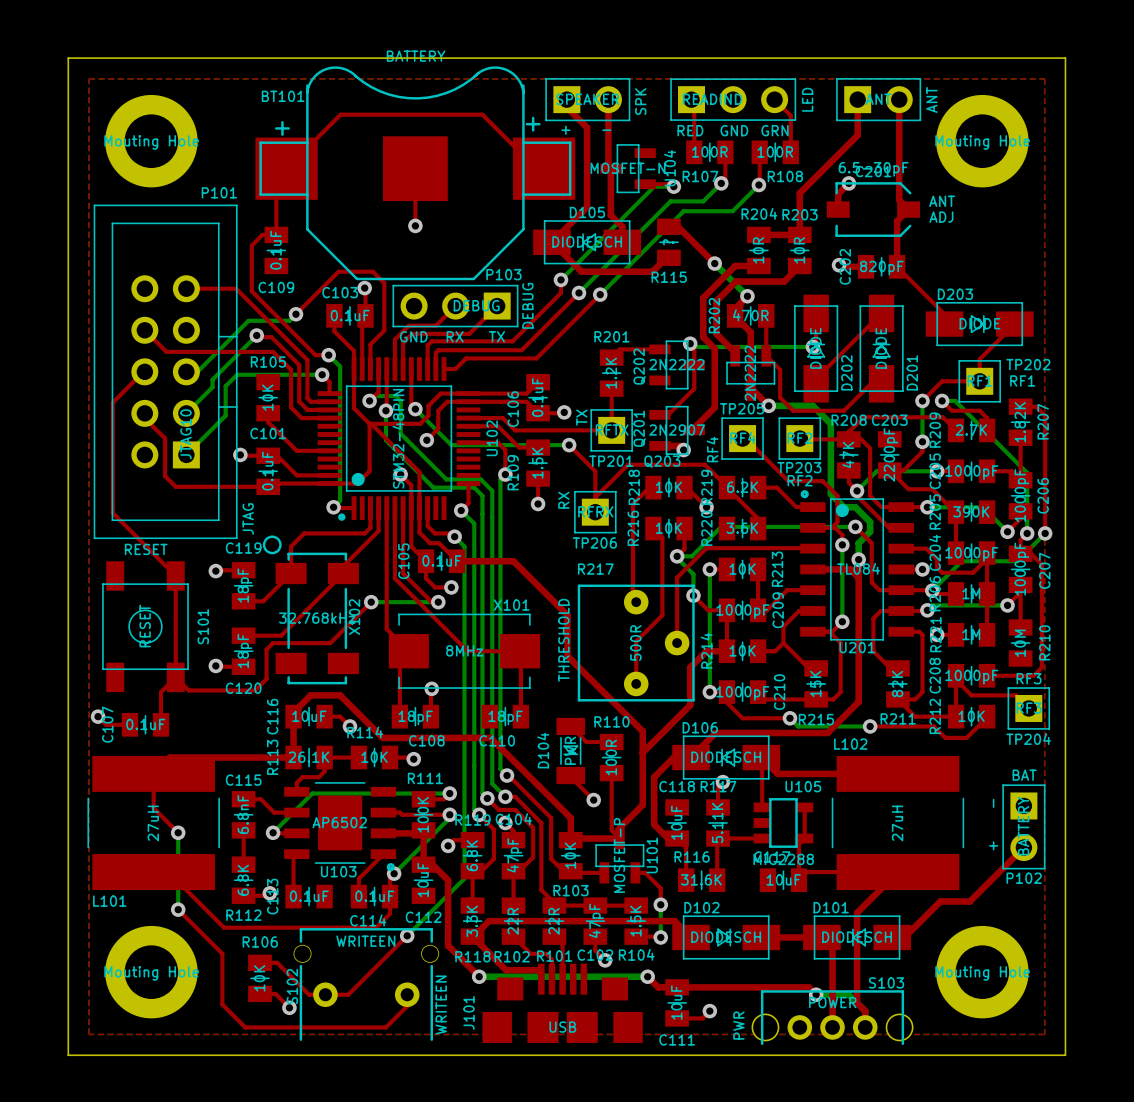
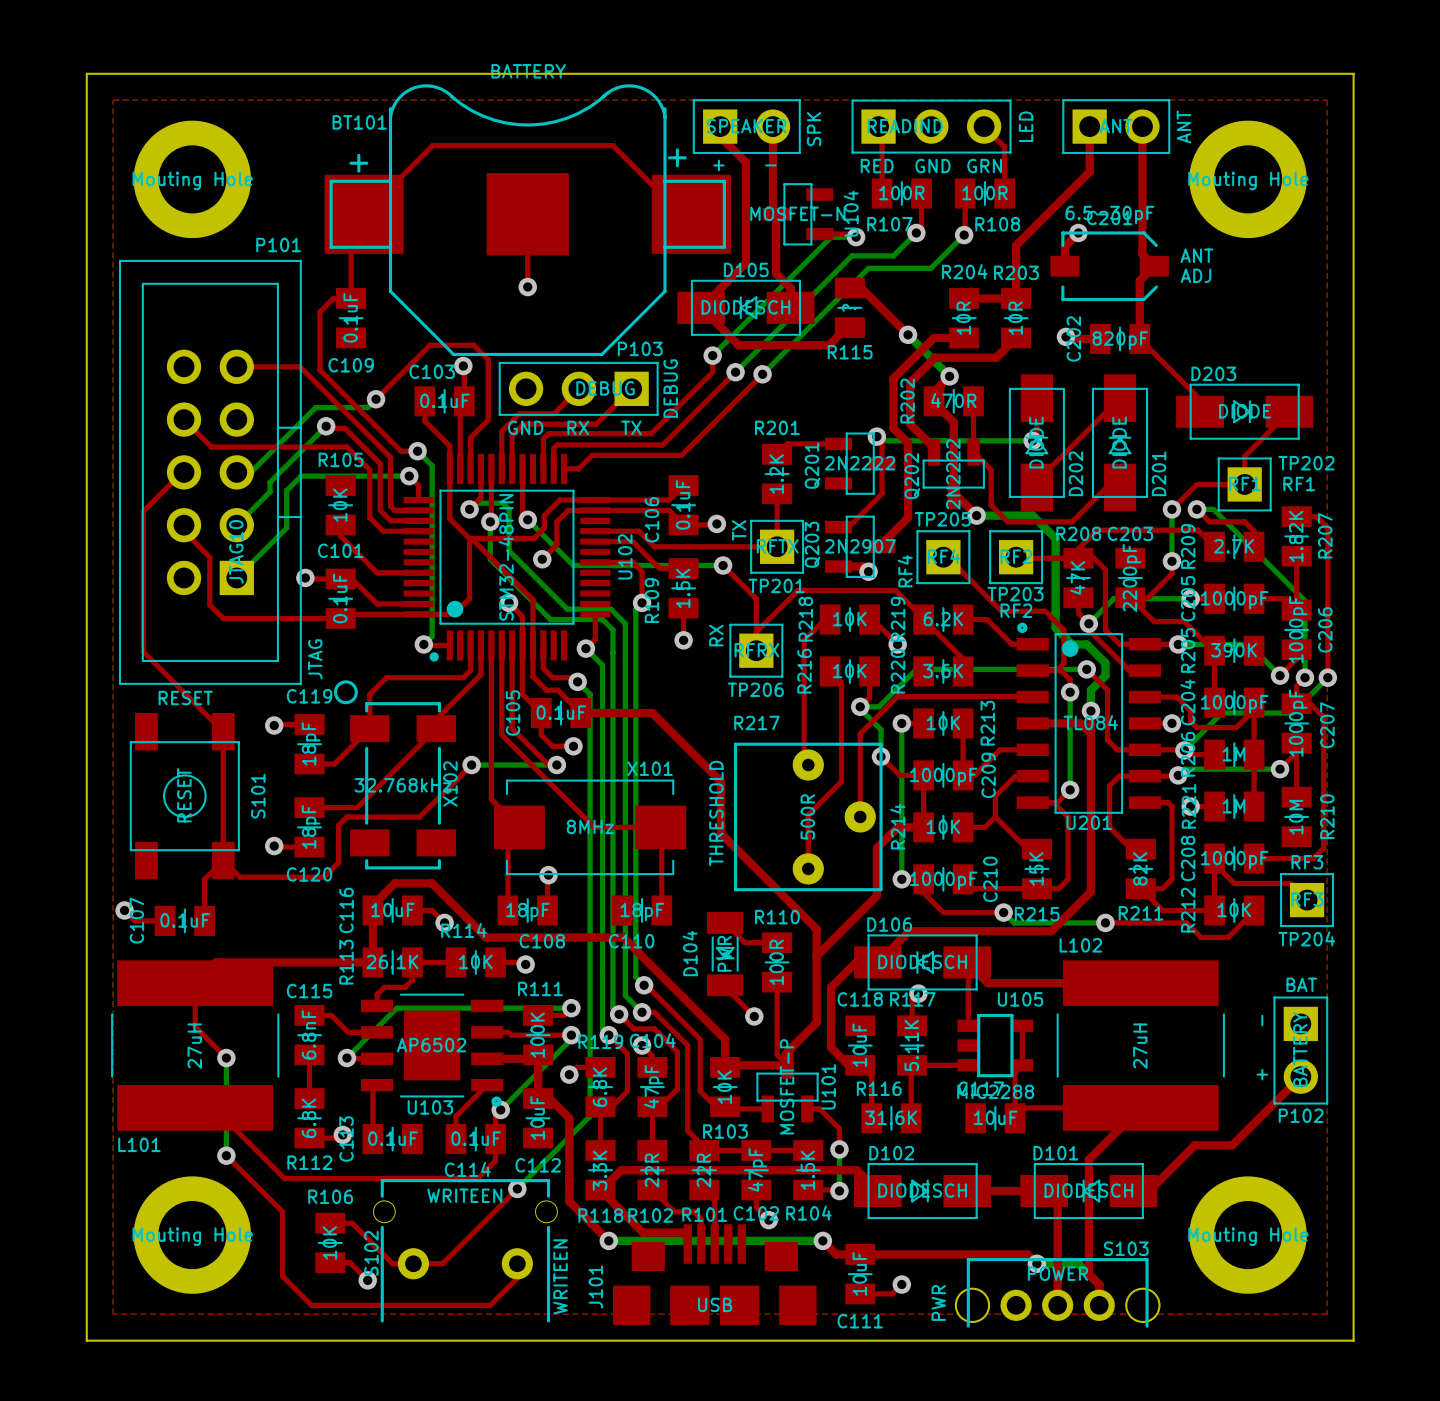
Q202 name position: Q202 (639, 366) -> Q202 (912, 476)
Q201 name position: Q201 (639, 428) -> Q201 (812, 465)
Q203 name rotation: 0° (662, 461) -> 90° counterclockwise (812, 544)

